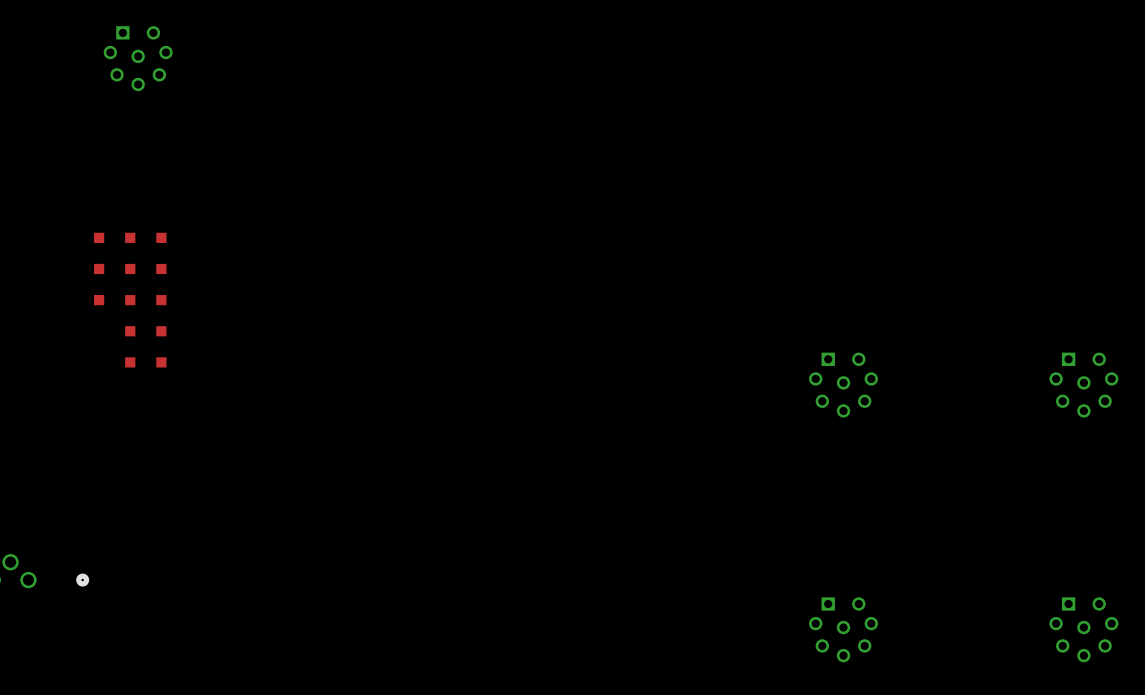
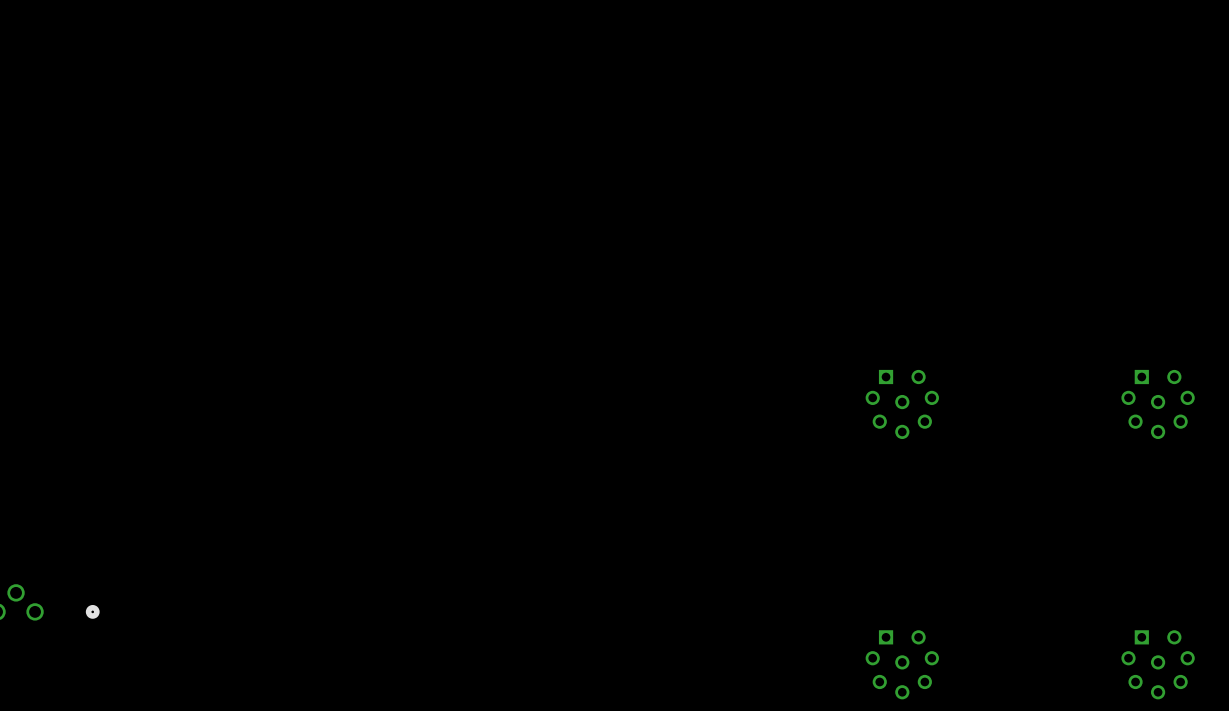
part: (138, 58) -> none
part: (99, 237) -> none
part: (130, 237) -> none
part: (161, 237) -> none
part: (99, 268) -> none
part: (130, 268) -> none
part: (161, 268) -> none
part: (99, 300) -> none
part: (130, 300) -> none
part: (161, 300) -> none
part: (130, 331) -> none
part: (161, 331) -> none
part: (130, 362) -> none
part: (161, 362) -> none

